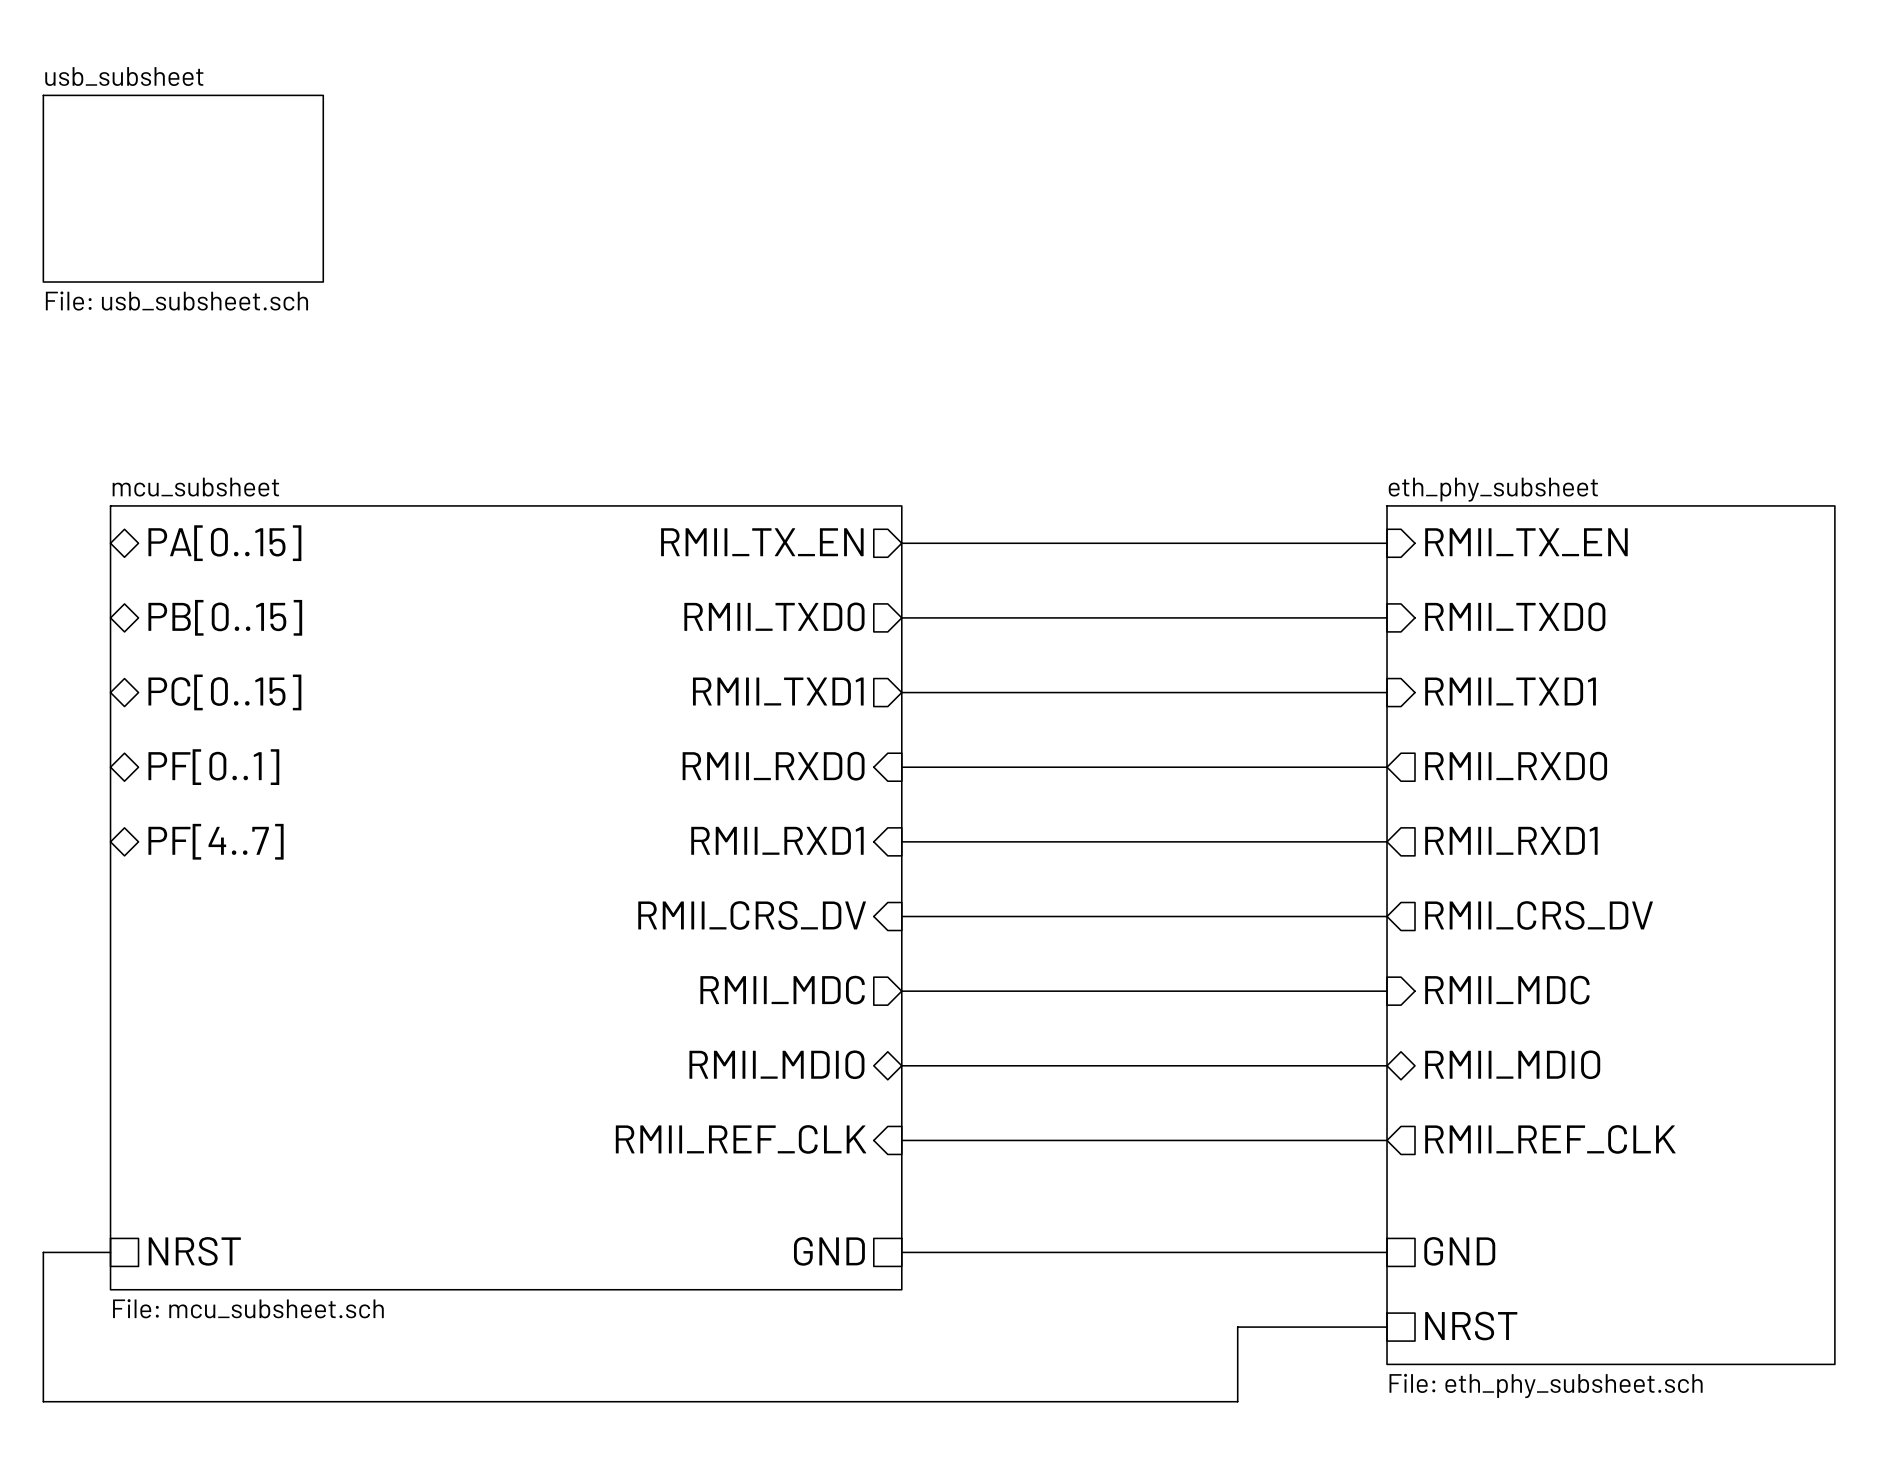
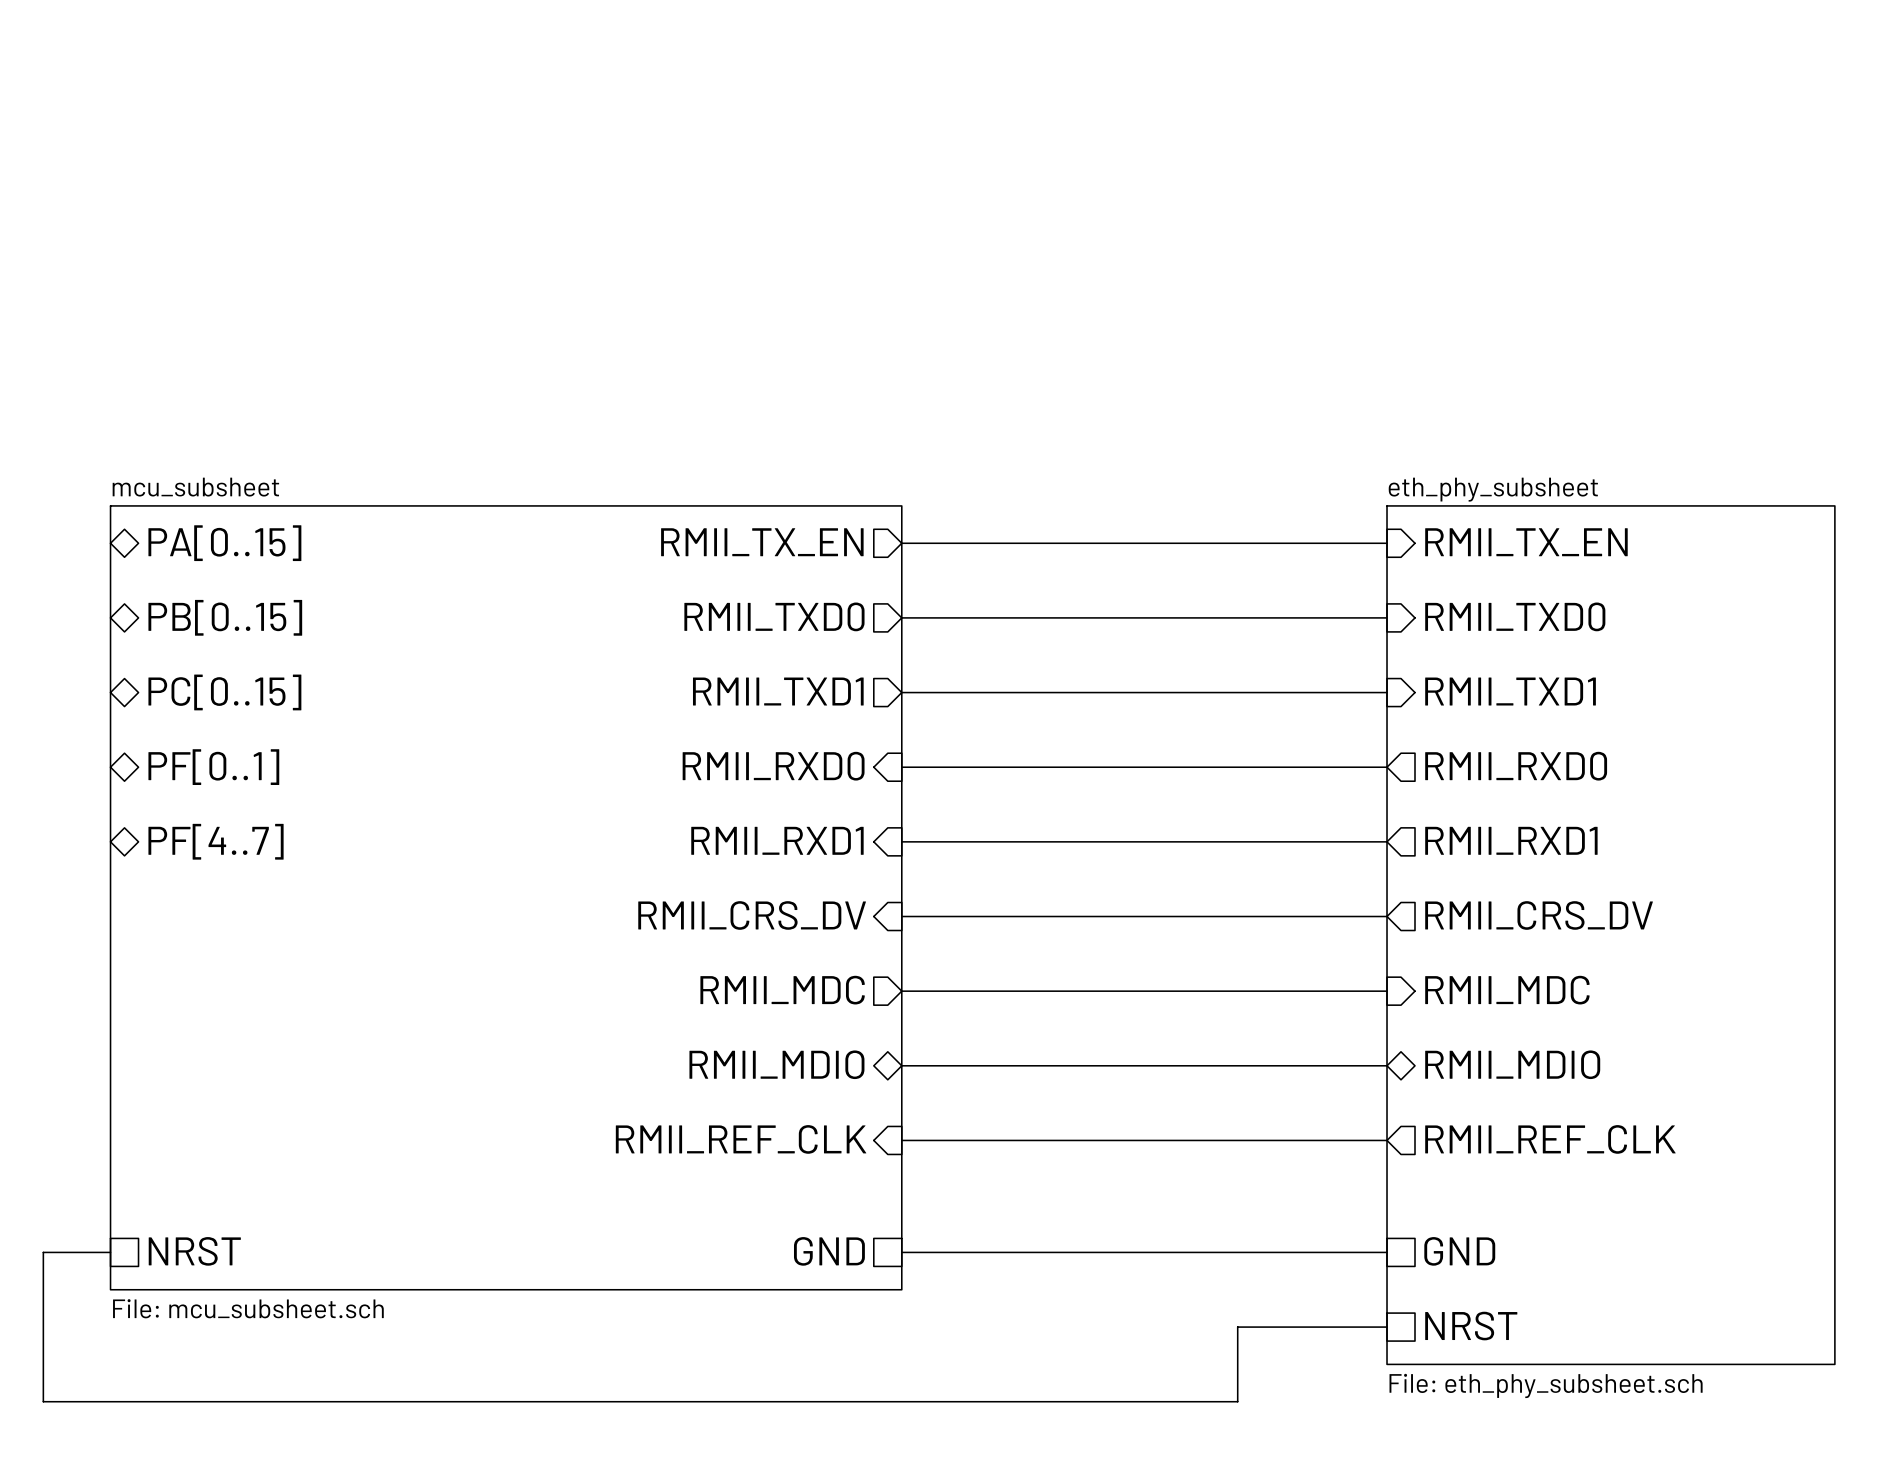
sheet usb_subsheet: File: usb_subsheet.sch (183, 188) -> none

